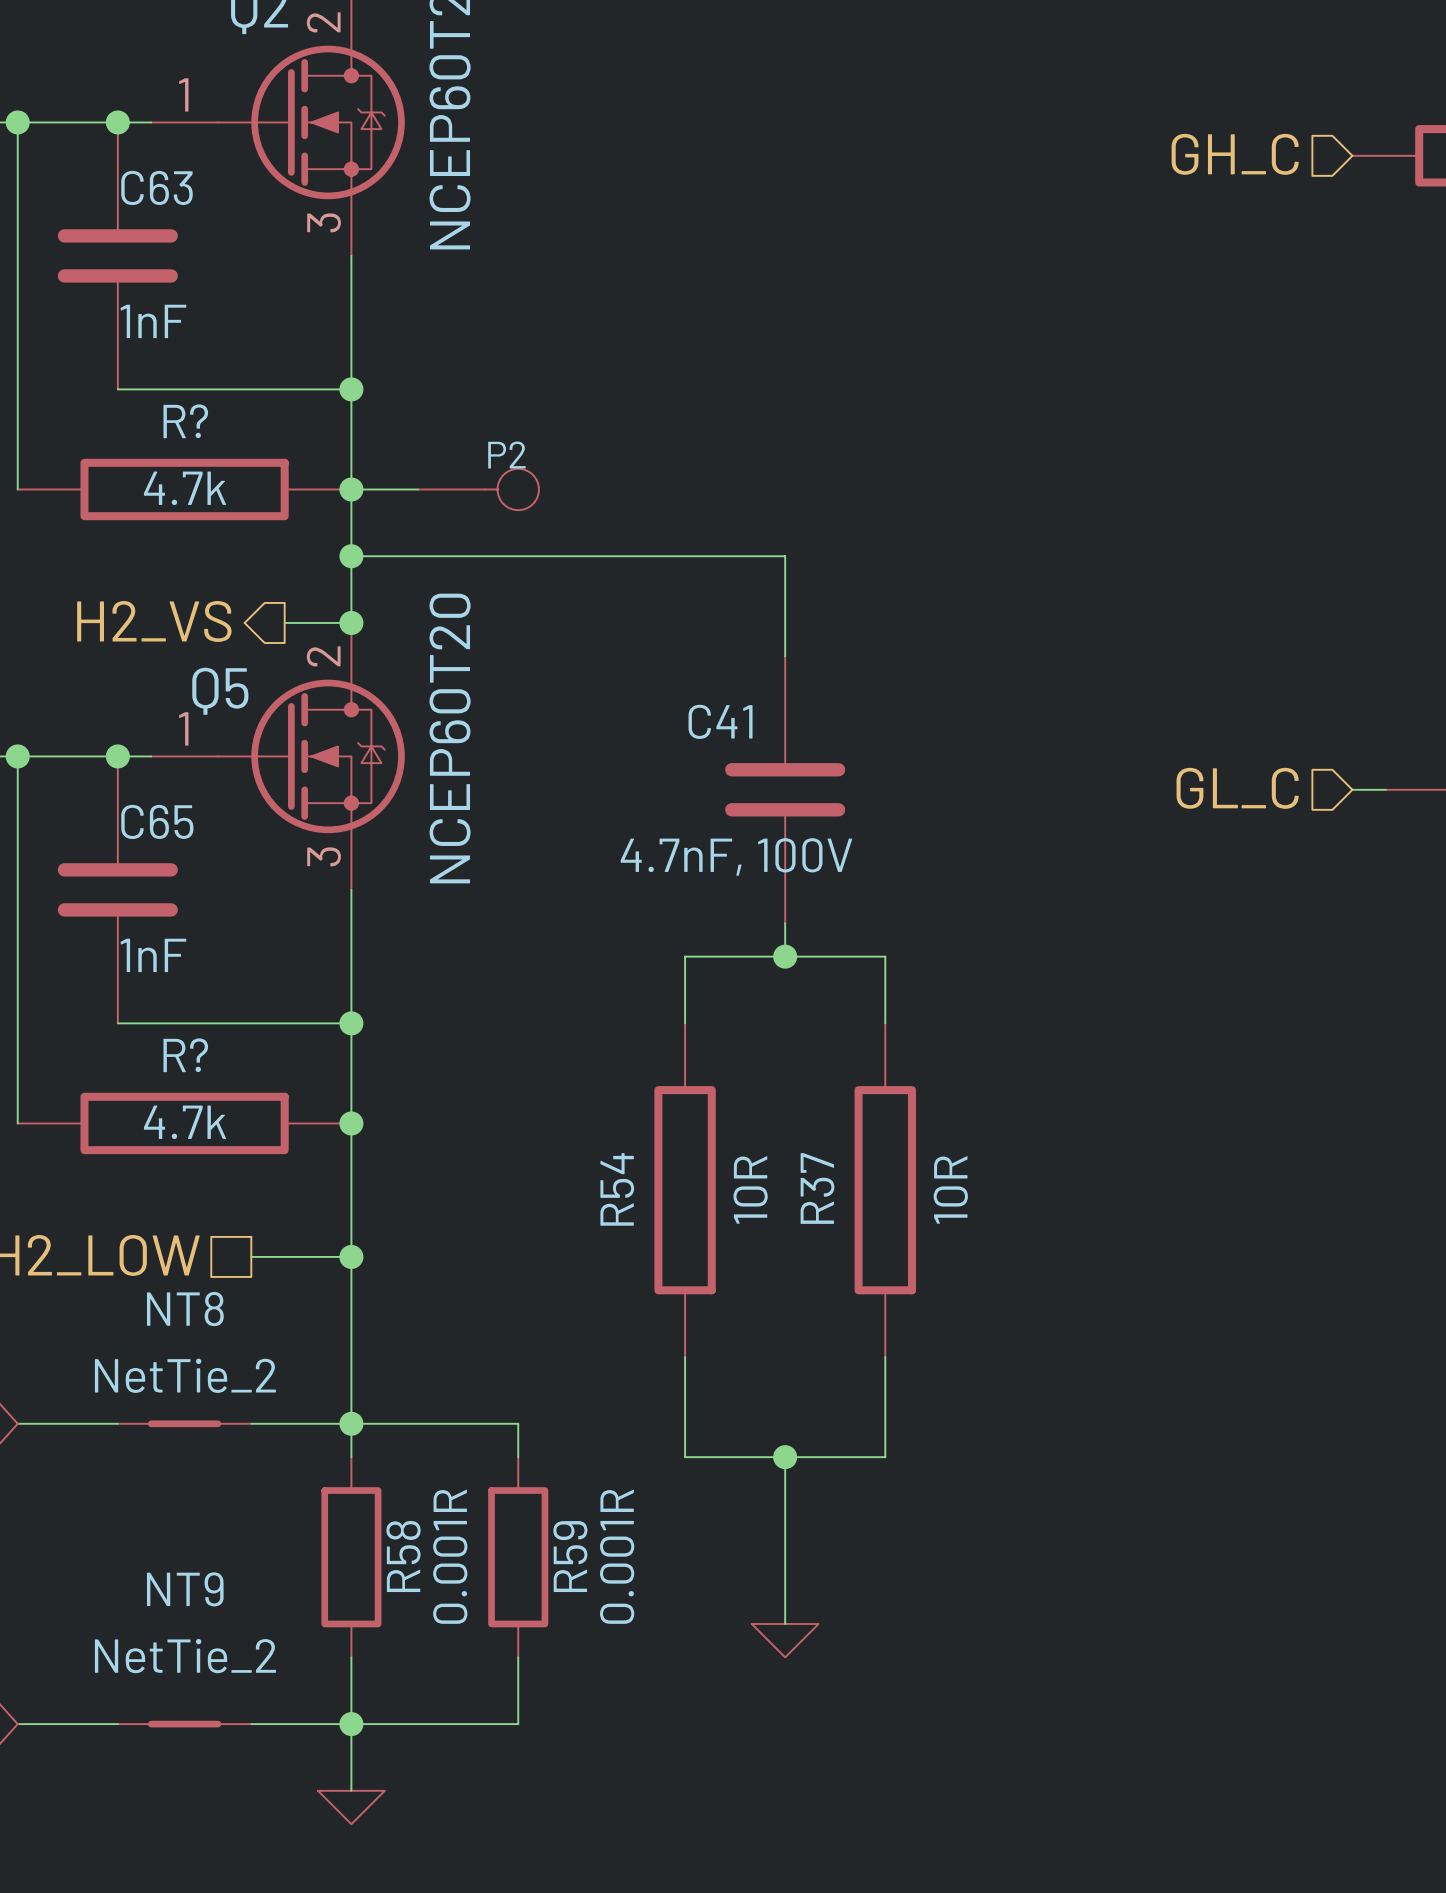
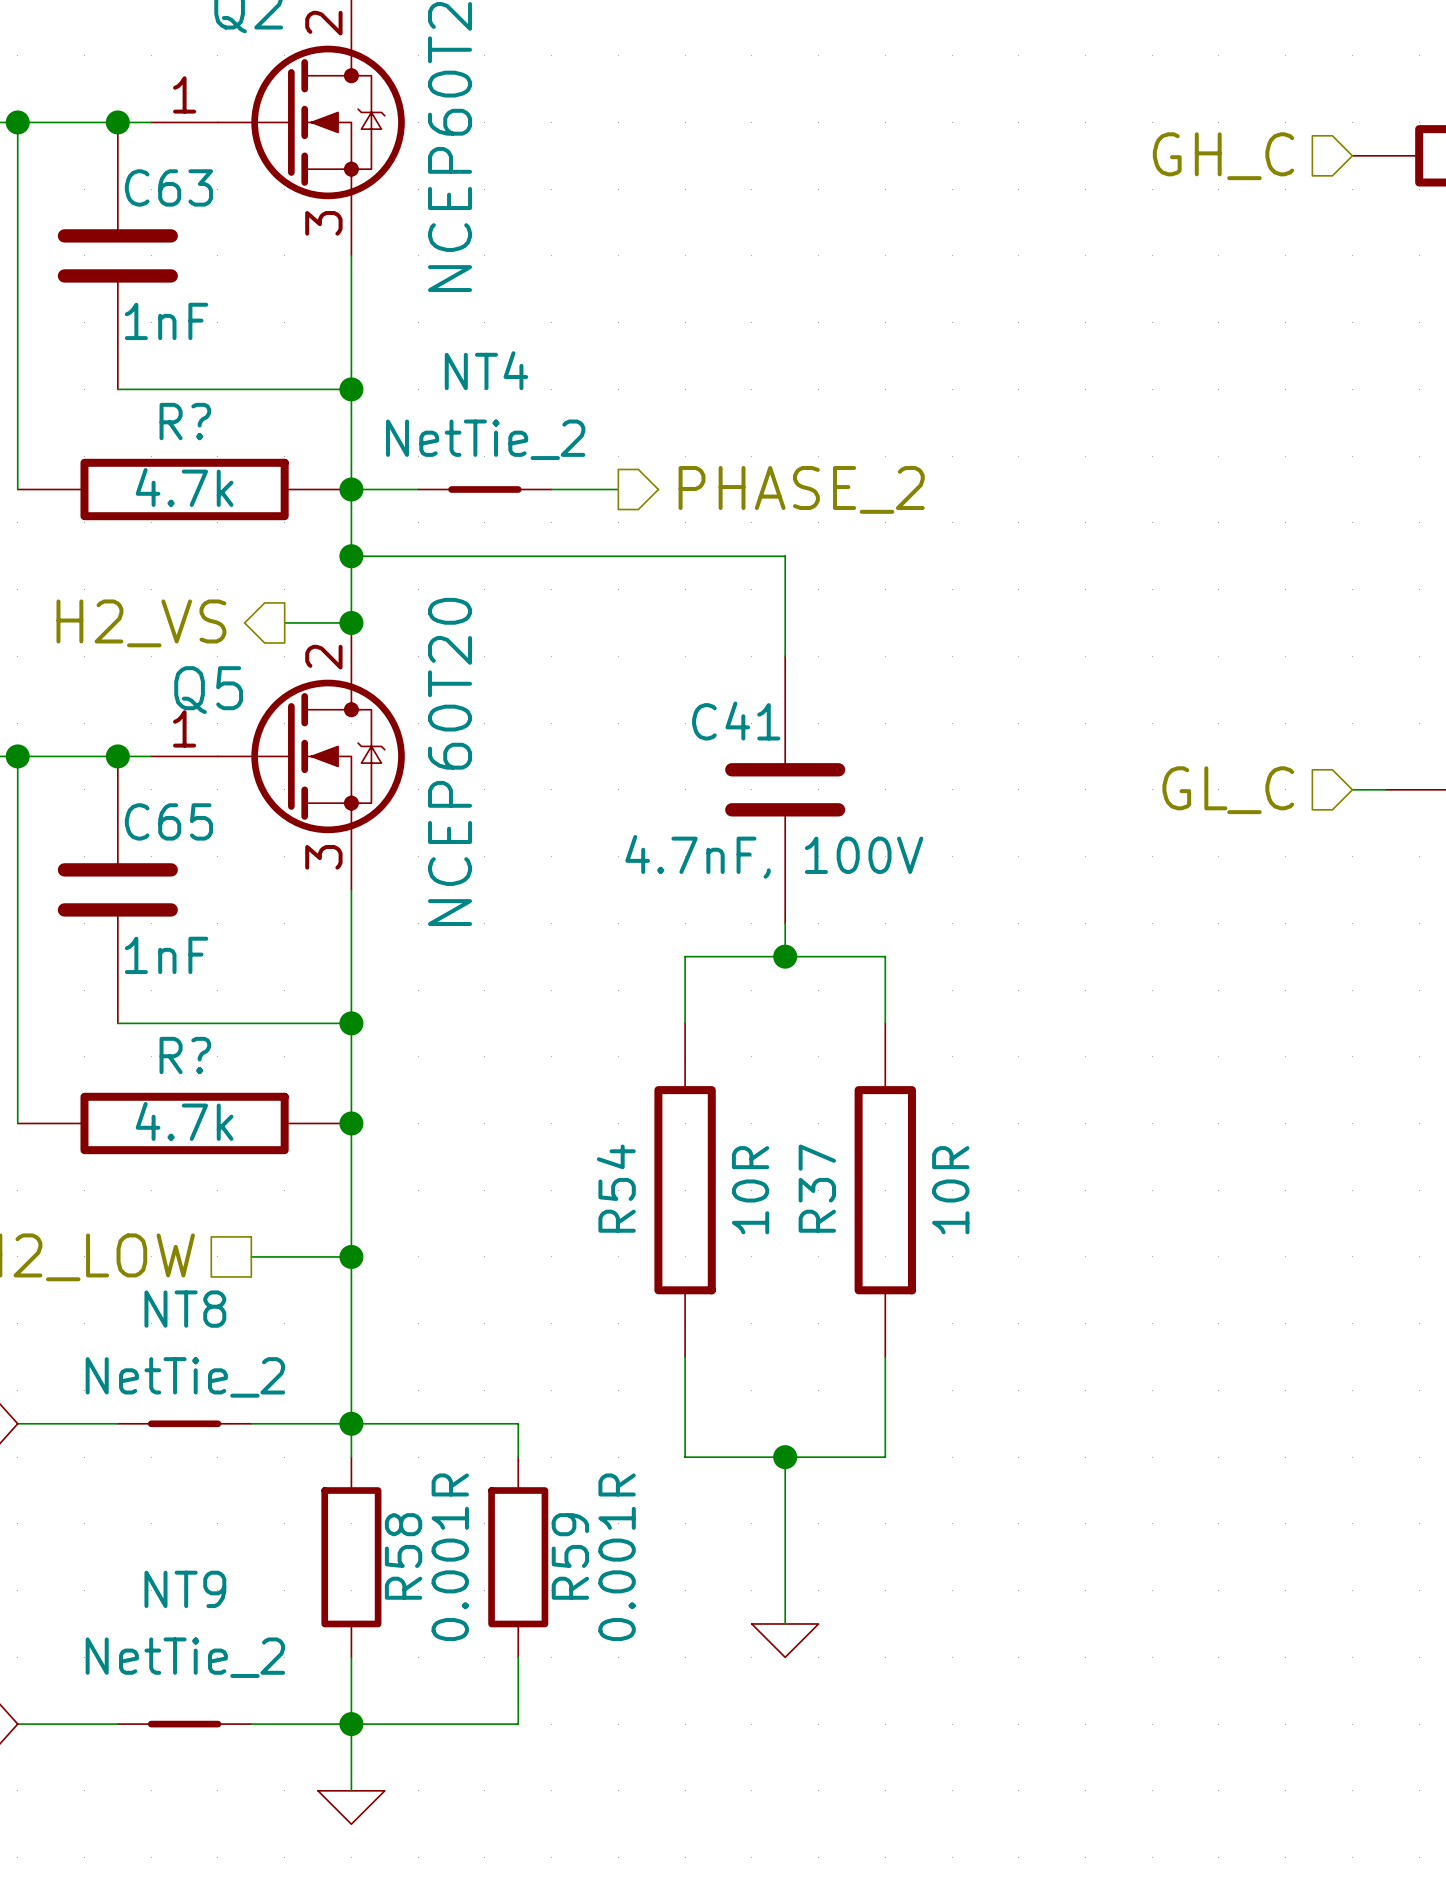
hierarchical label: none -> PHASE_2 (801, 489)
P2: (478, 489) -> none
NT4: none -> NetTie_2 (484, 489)
wire: none -> (551, 489) (618, 489)

